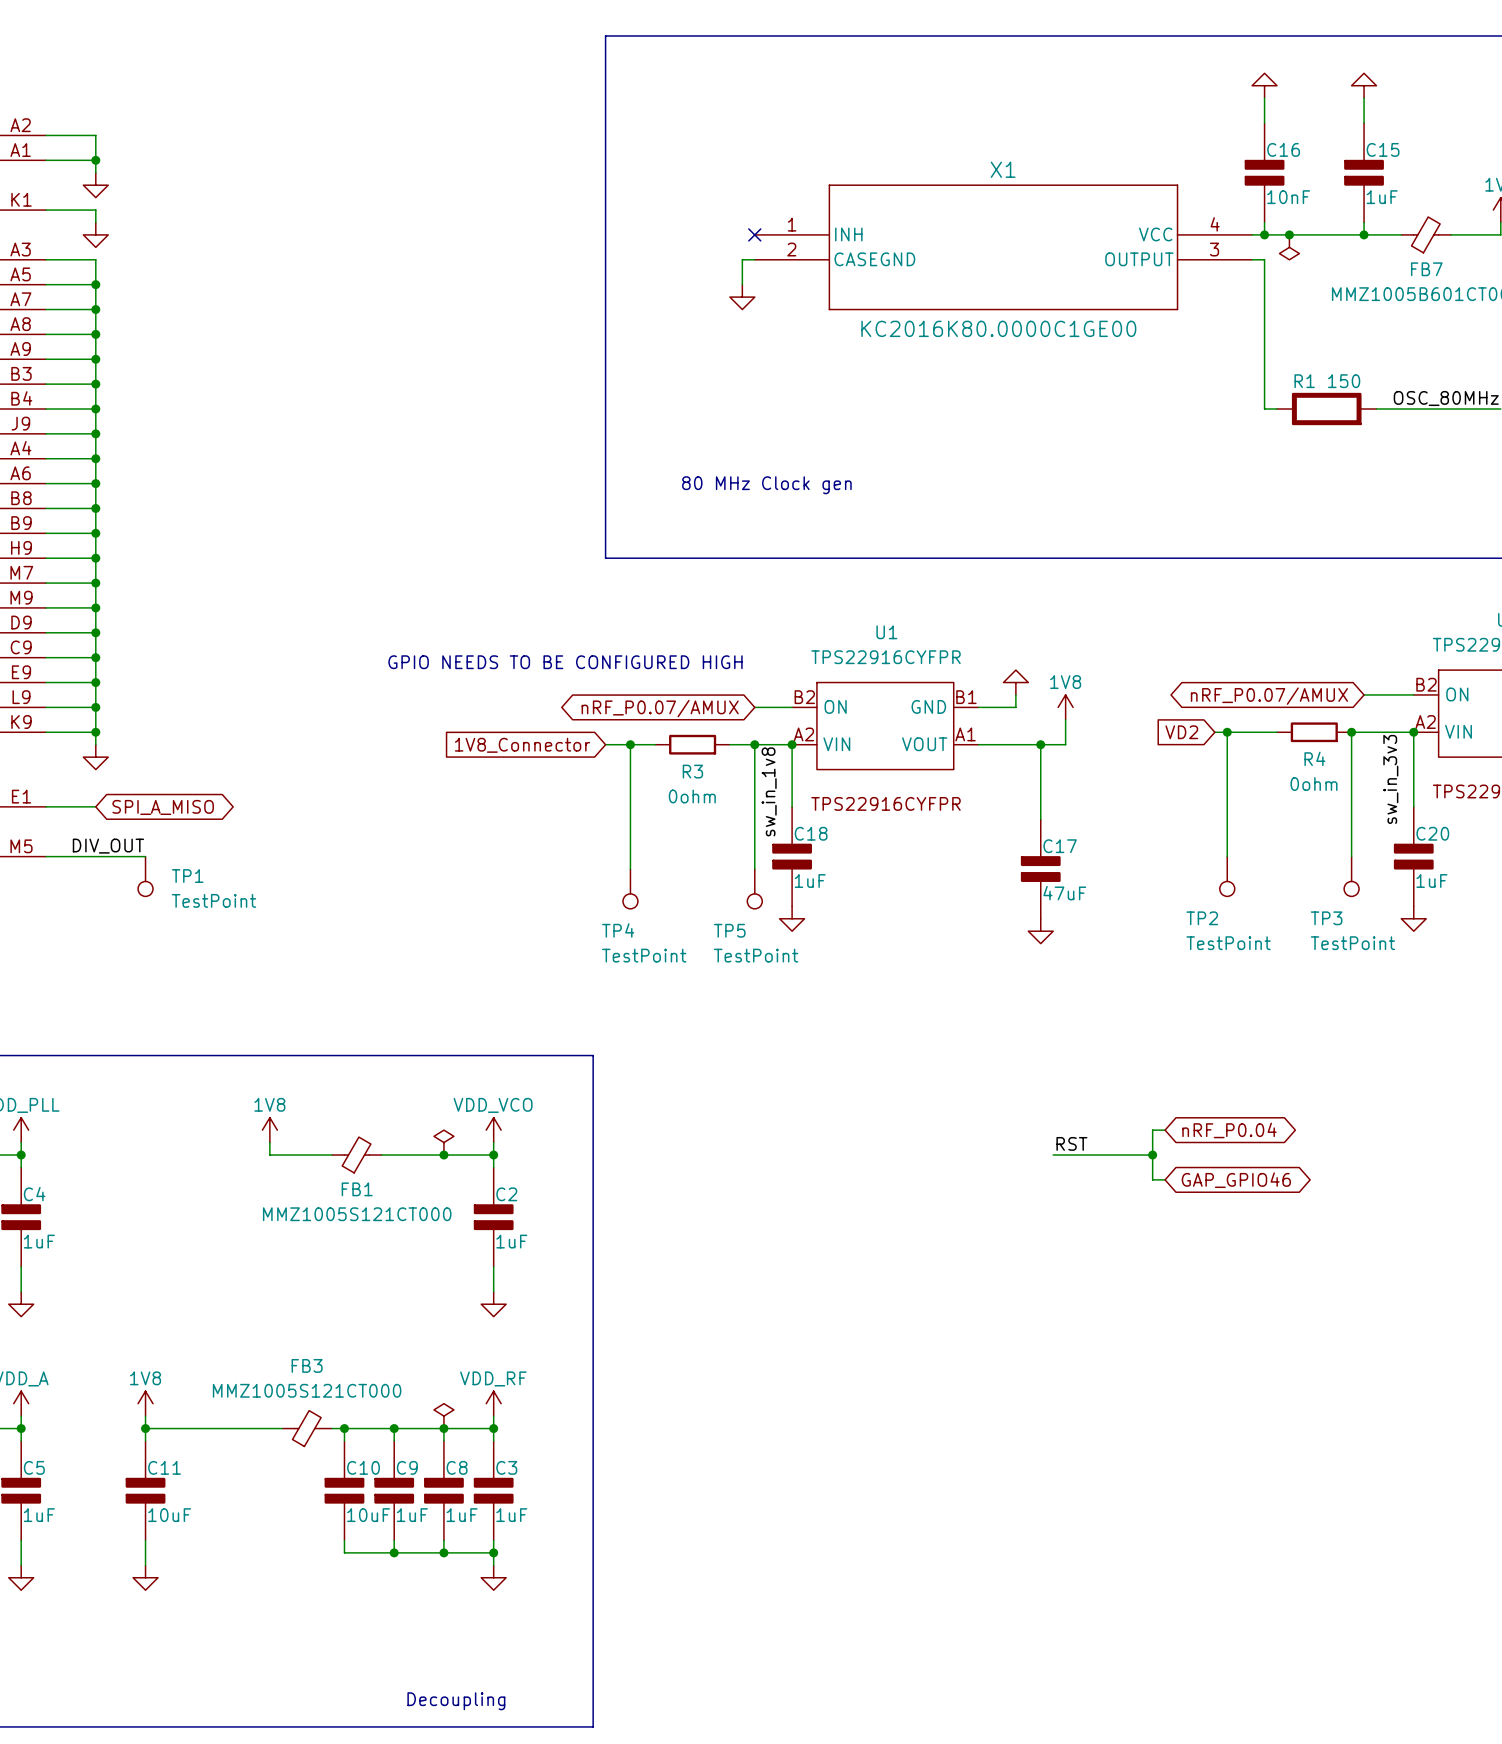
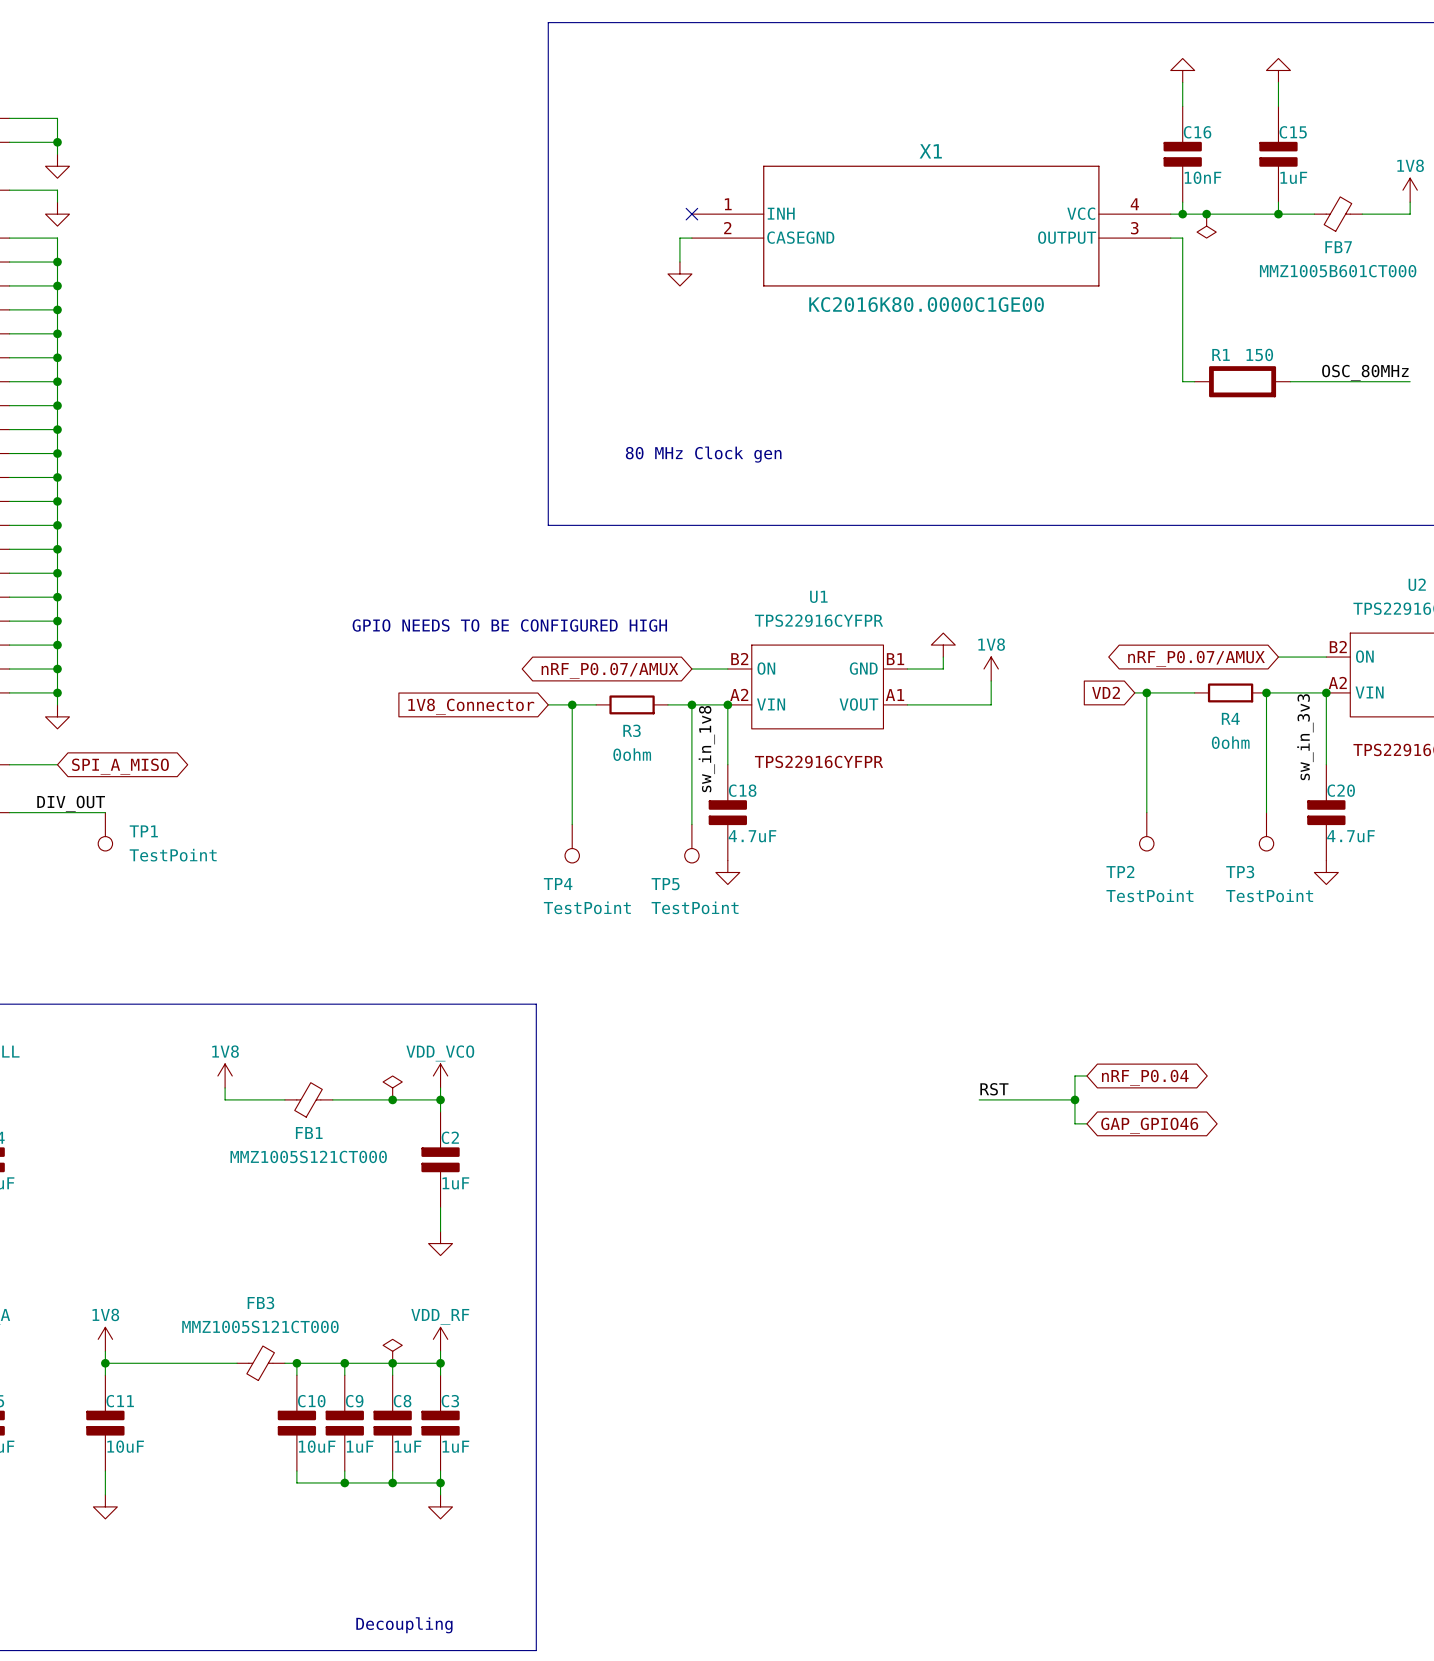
wire: (1040, 744) (1040, 819) -> none
junction: (1040, 744) -> none
C17: 47uF (1040, 869) -> none
C18 value: 1uF (810, 881) -> 4.7uF (752, 836)
C20 value: 1uF (1431, 881) -> 4.7uF (1350, 836)
power symbol: (1040, 931) -> none

